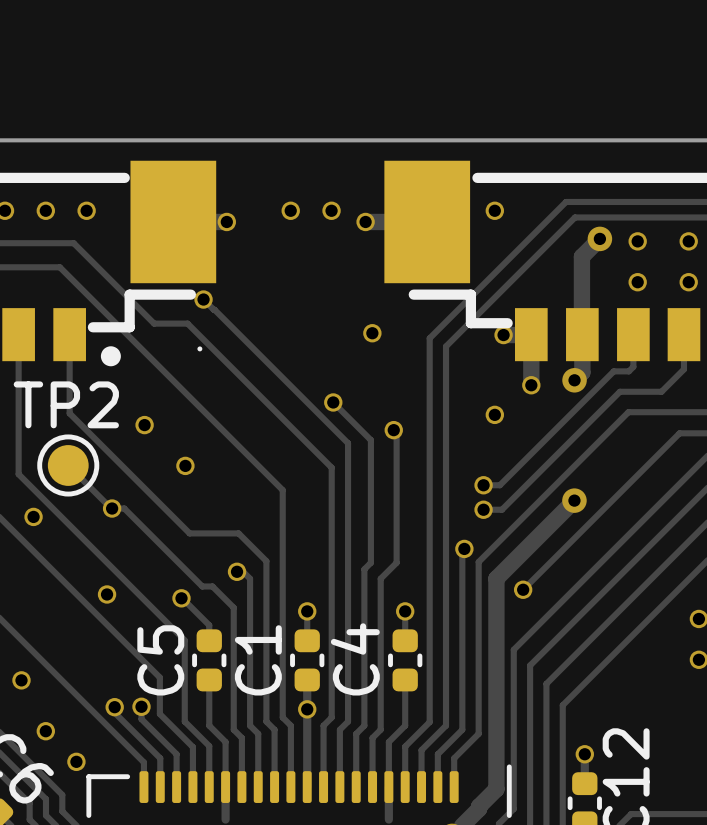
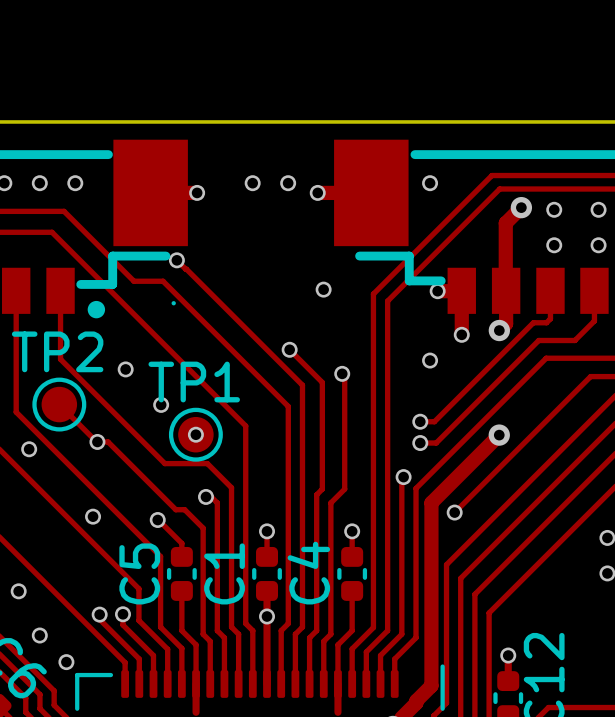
TP1: none -> (195, 434)
via: none -> (195, 434)

